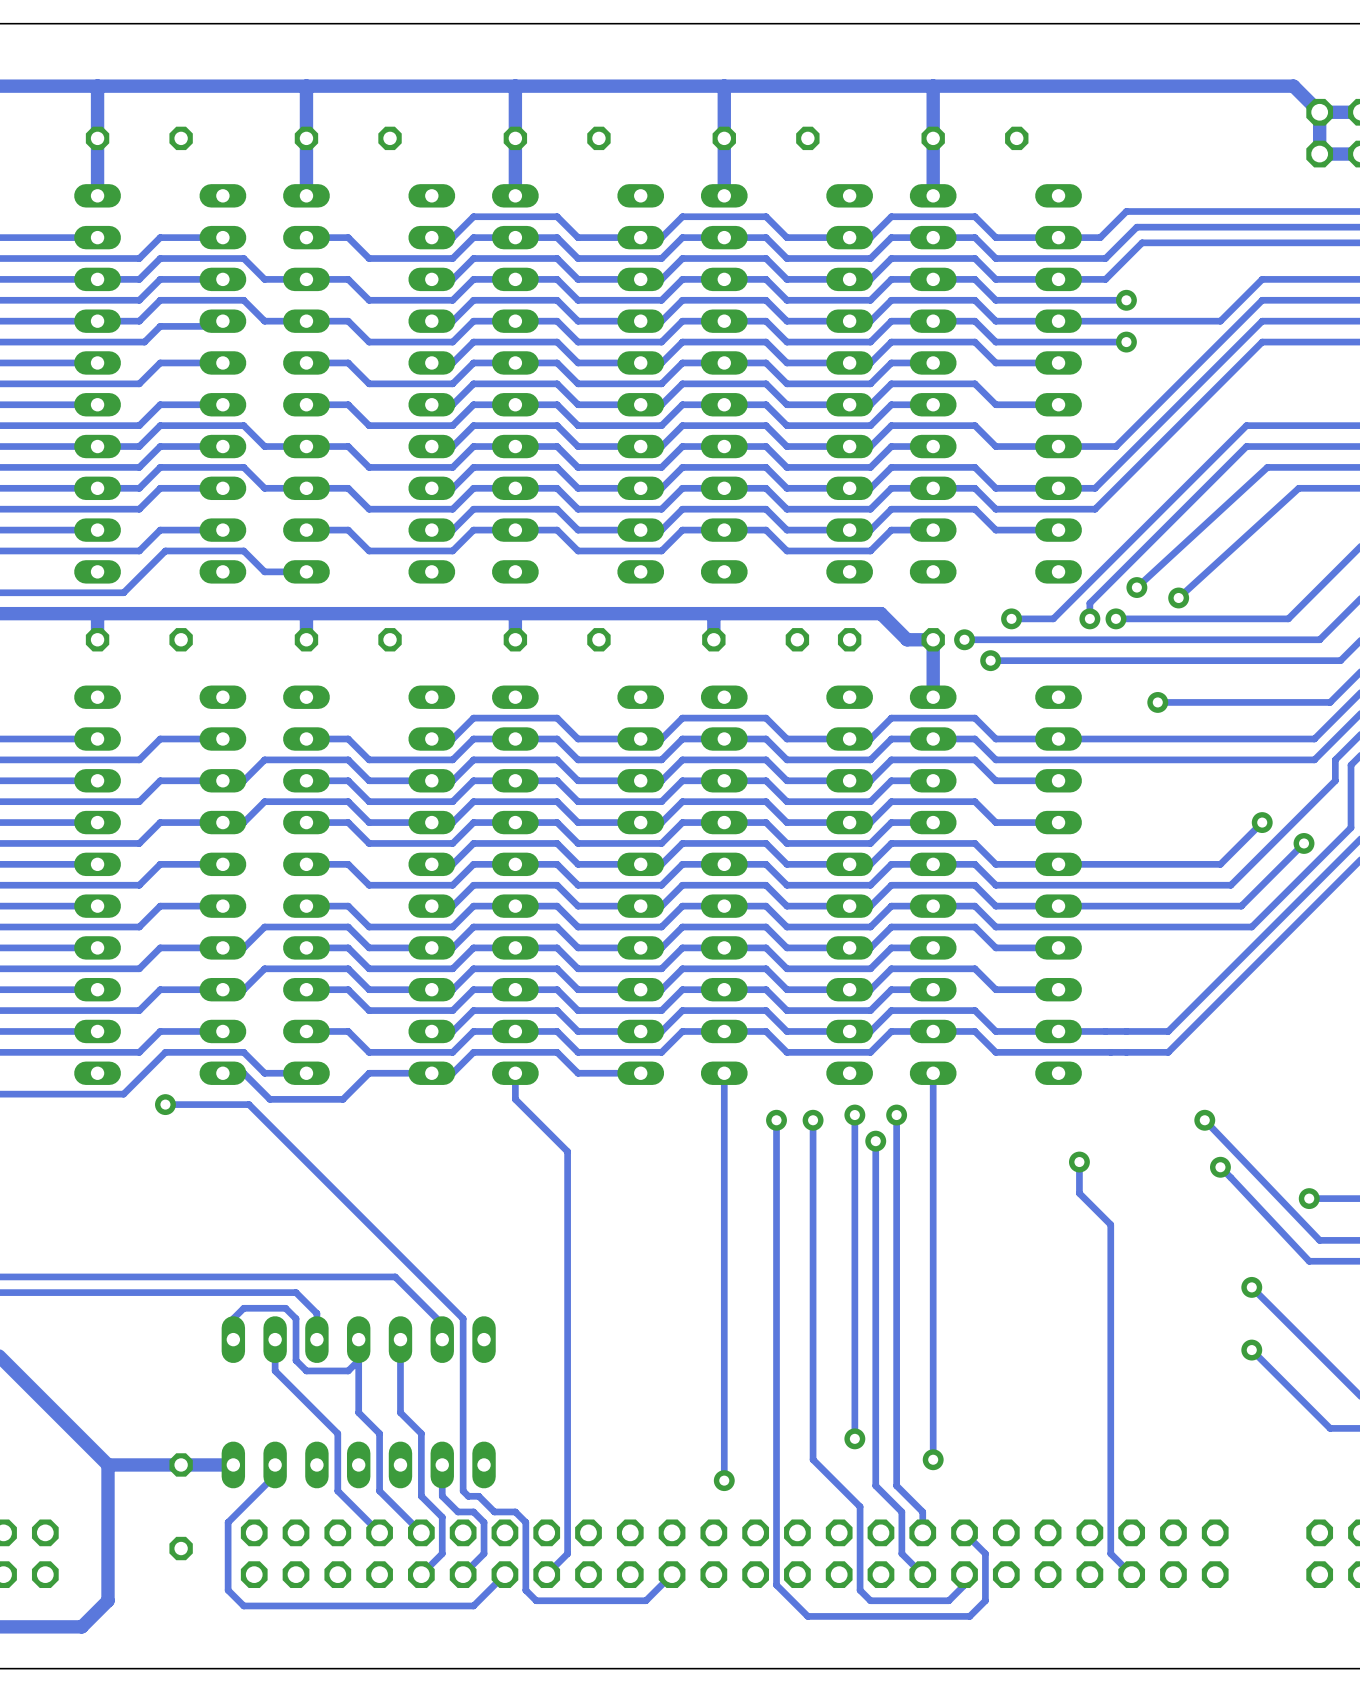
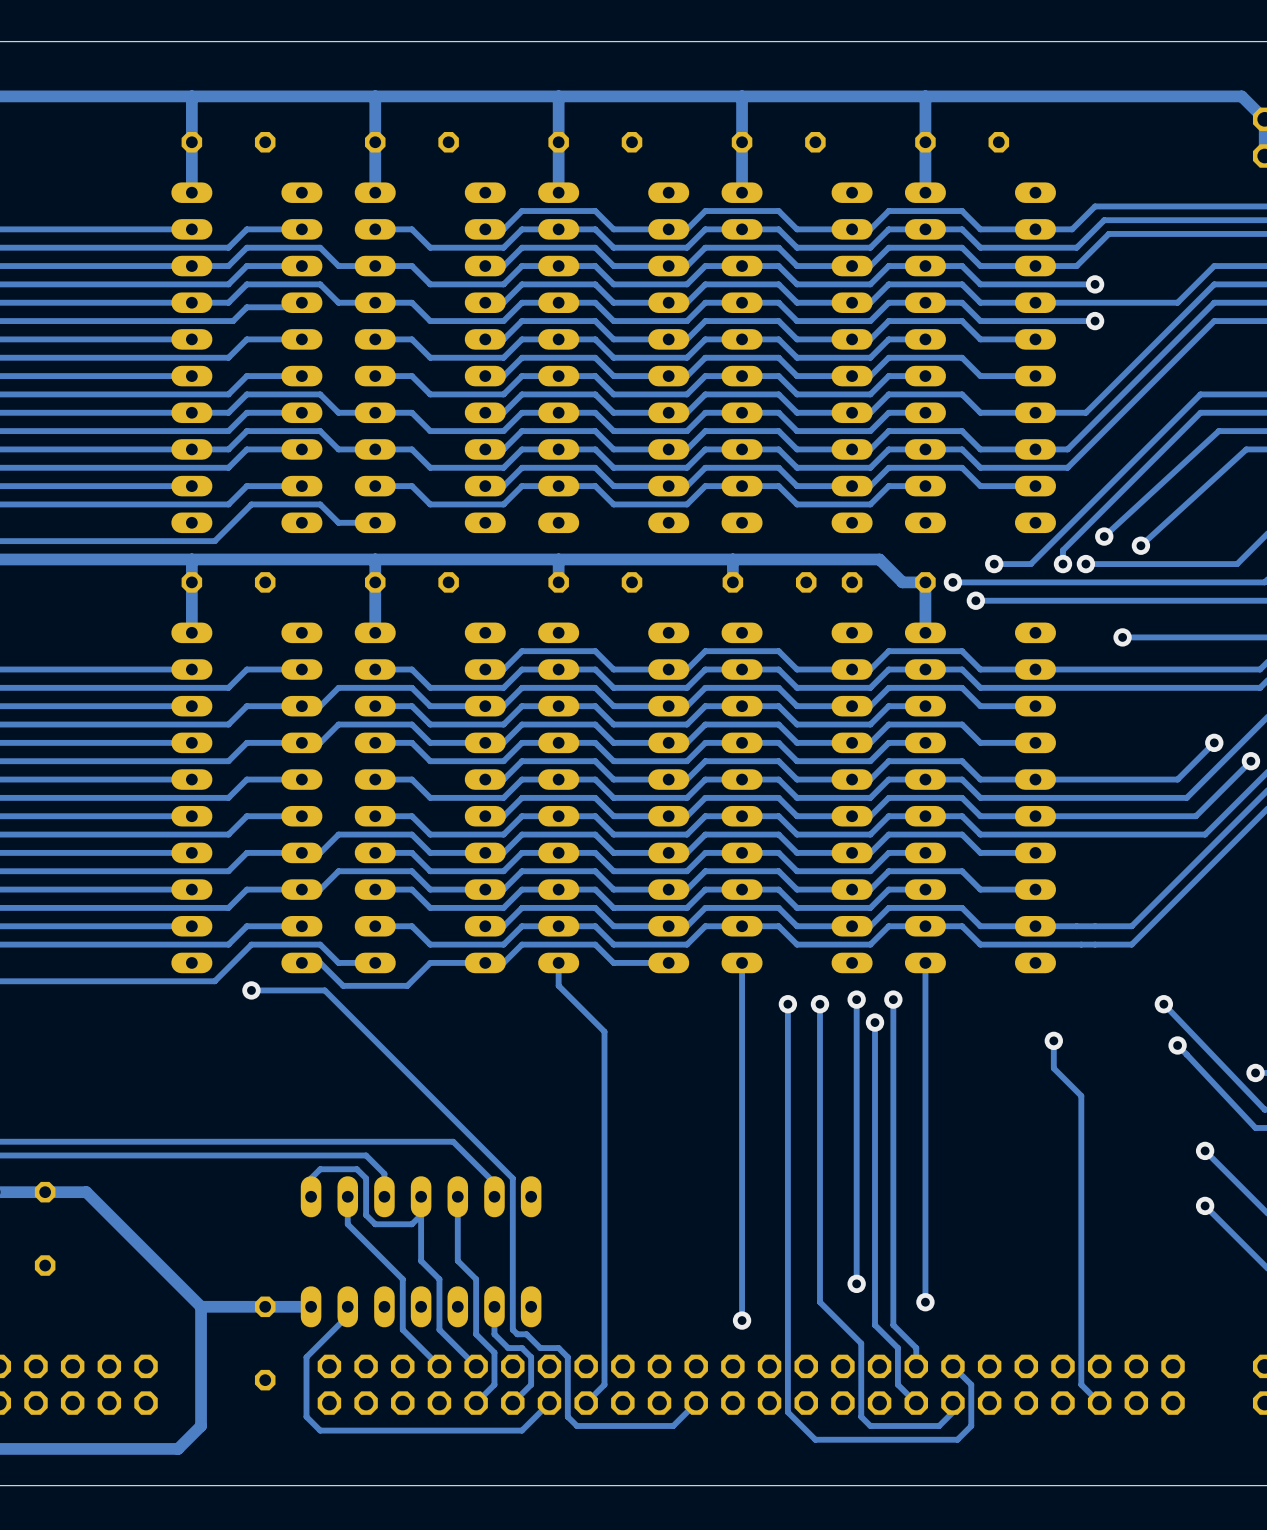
track: none -> (191, 582) (191, 632)
track: none -> (375, 582) (375, 632)

